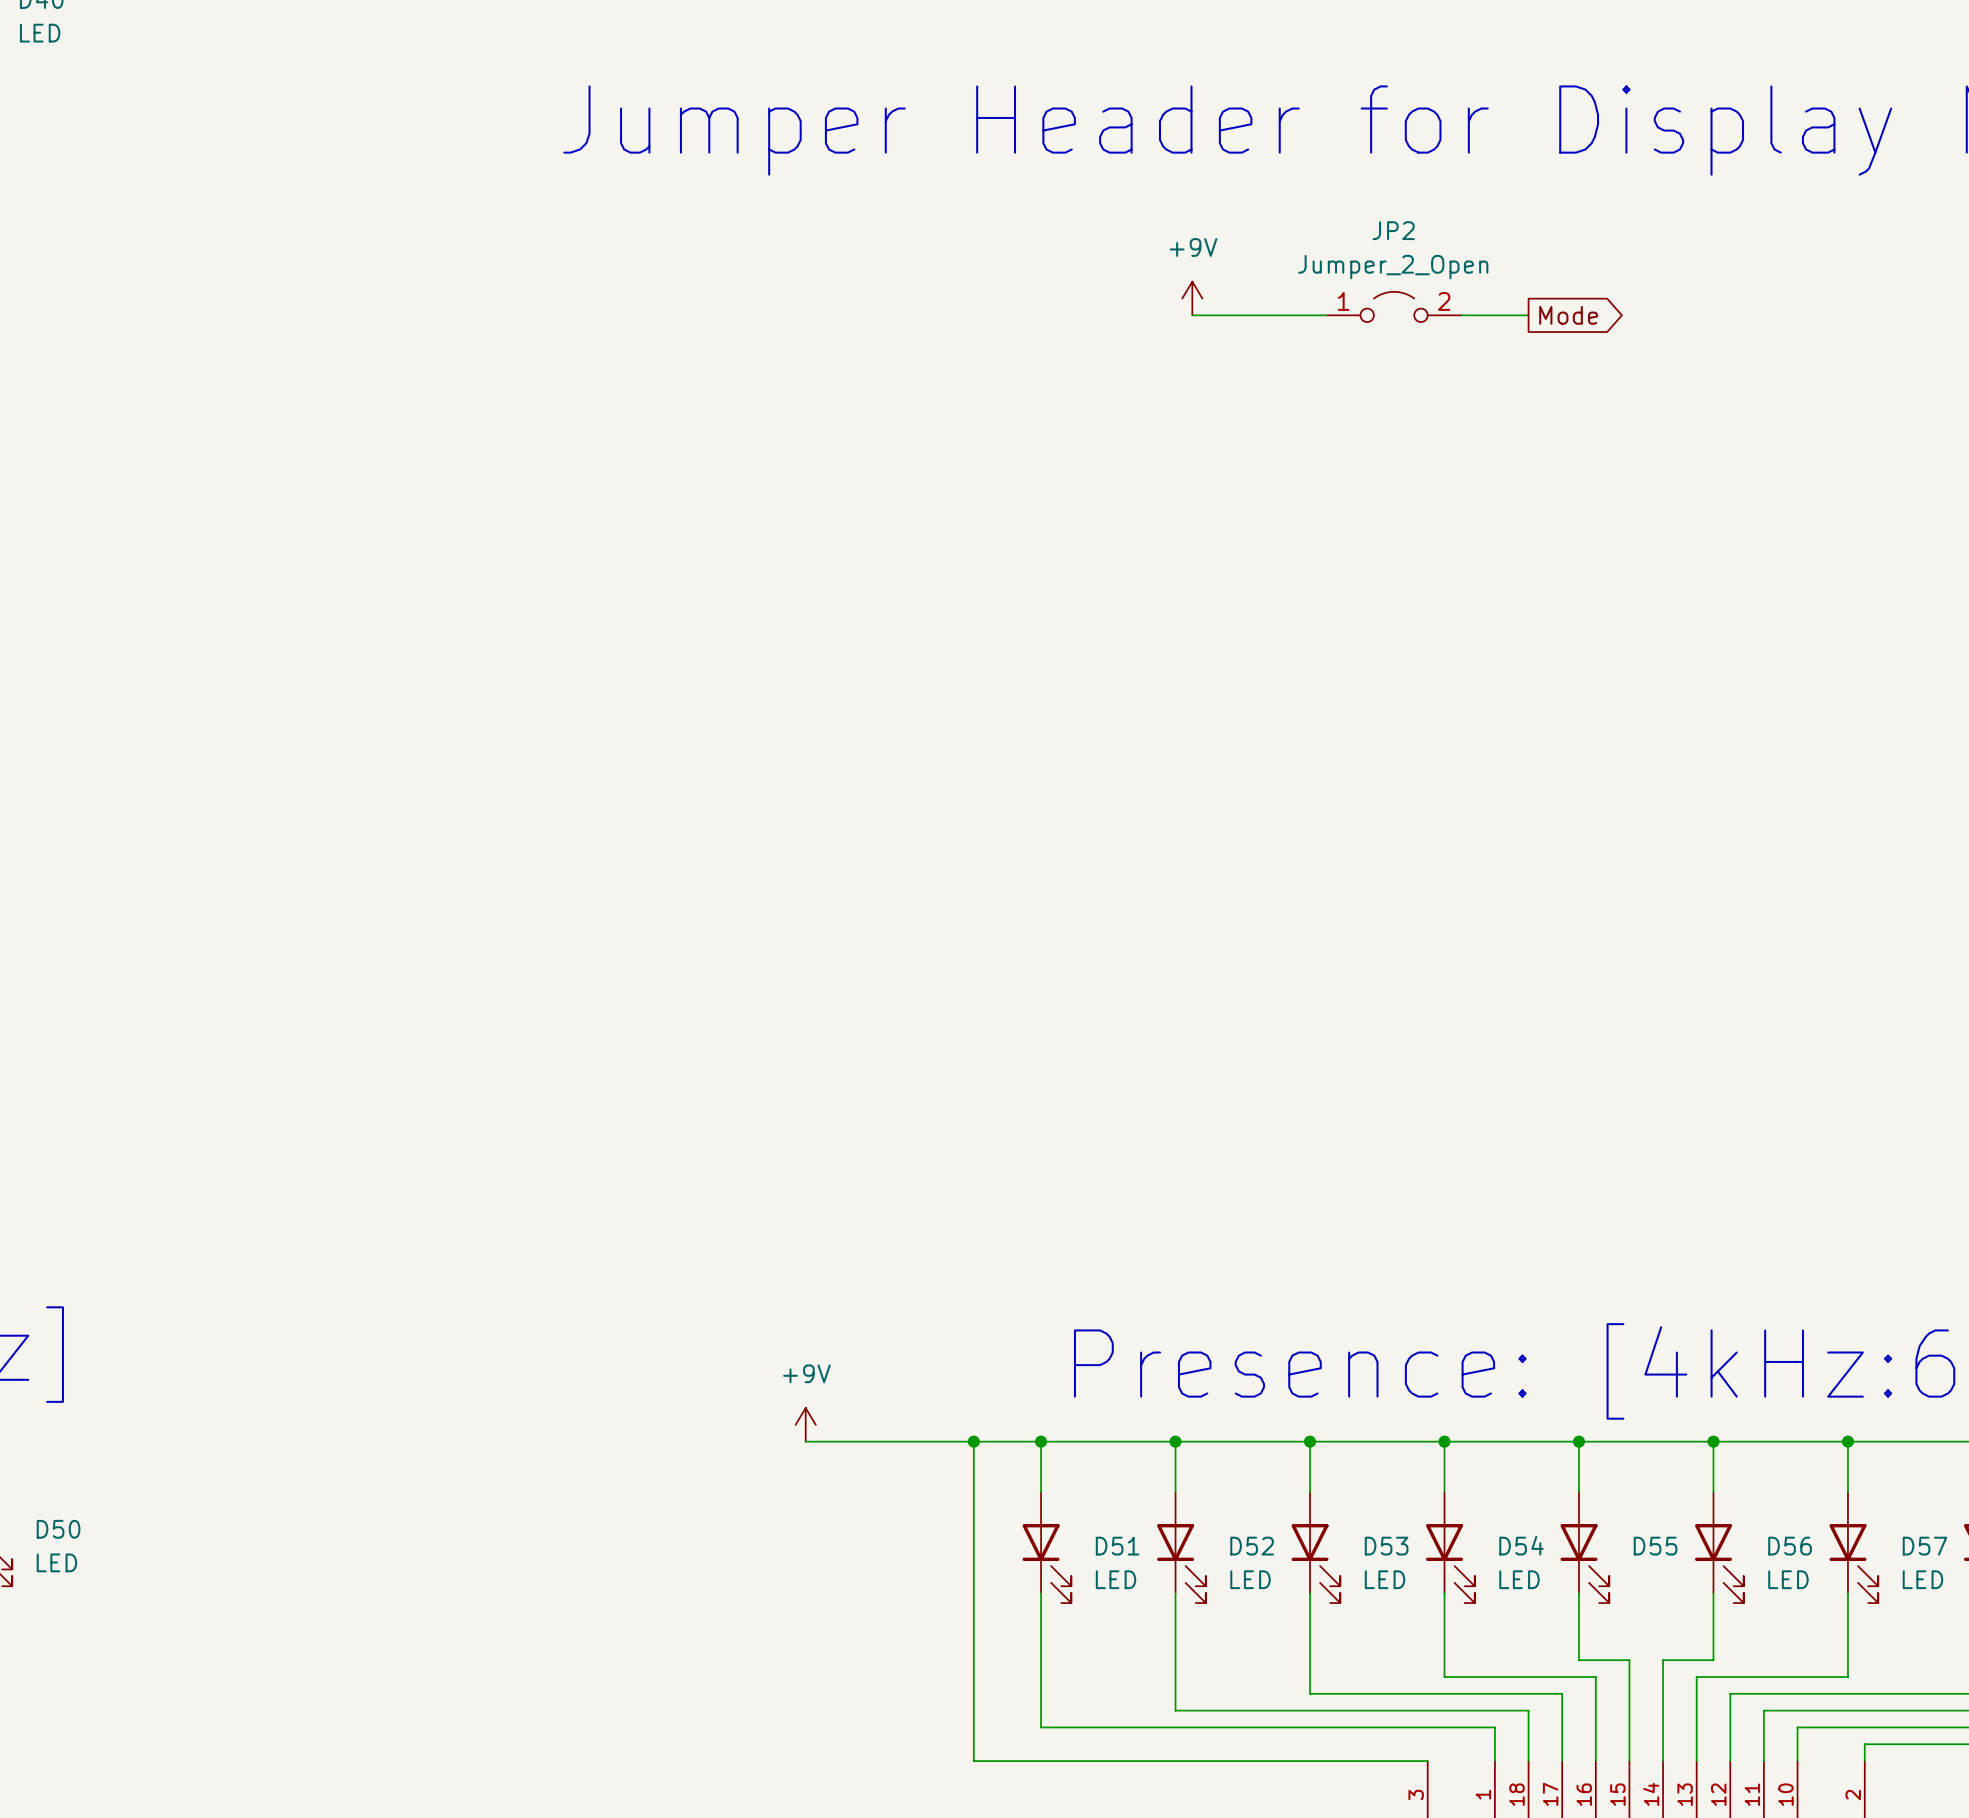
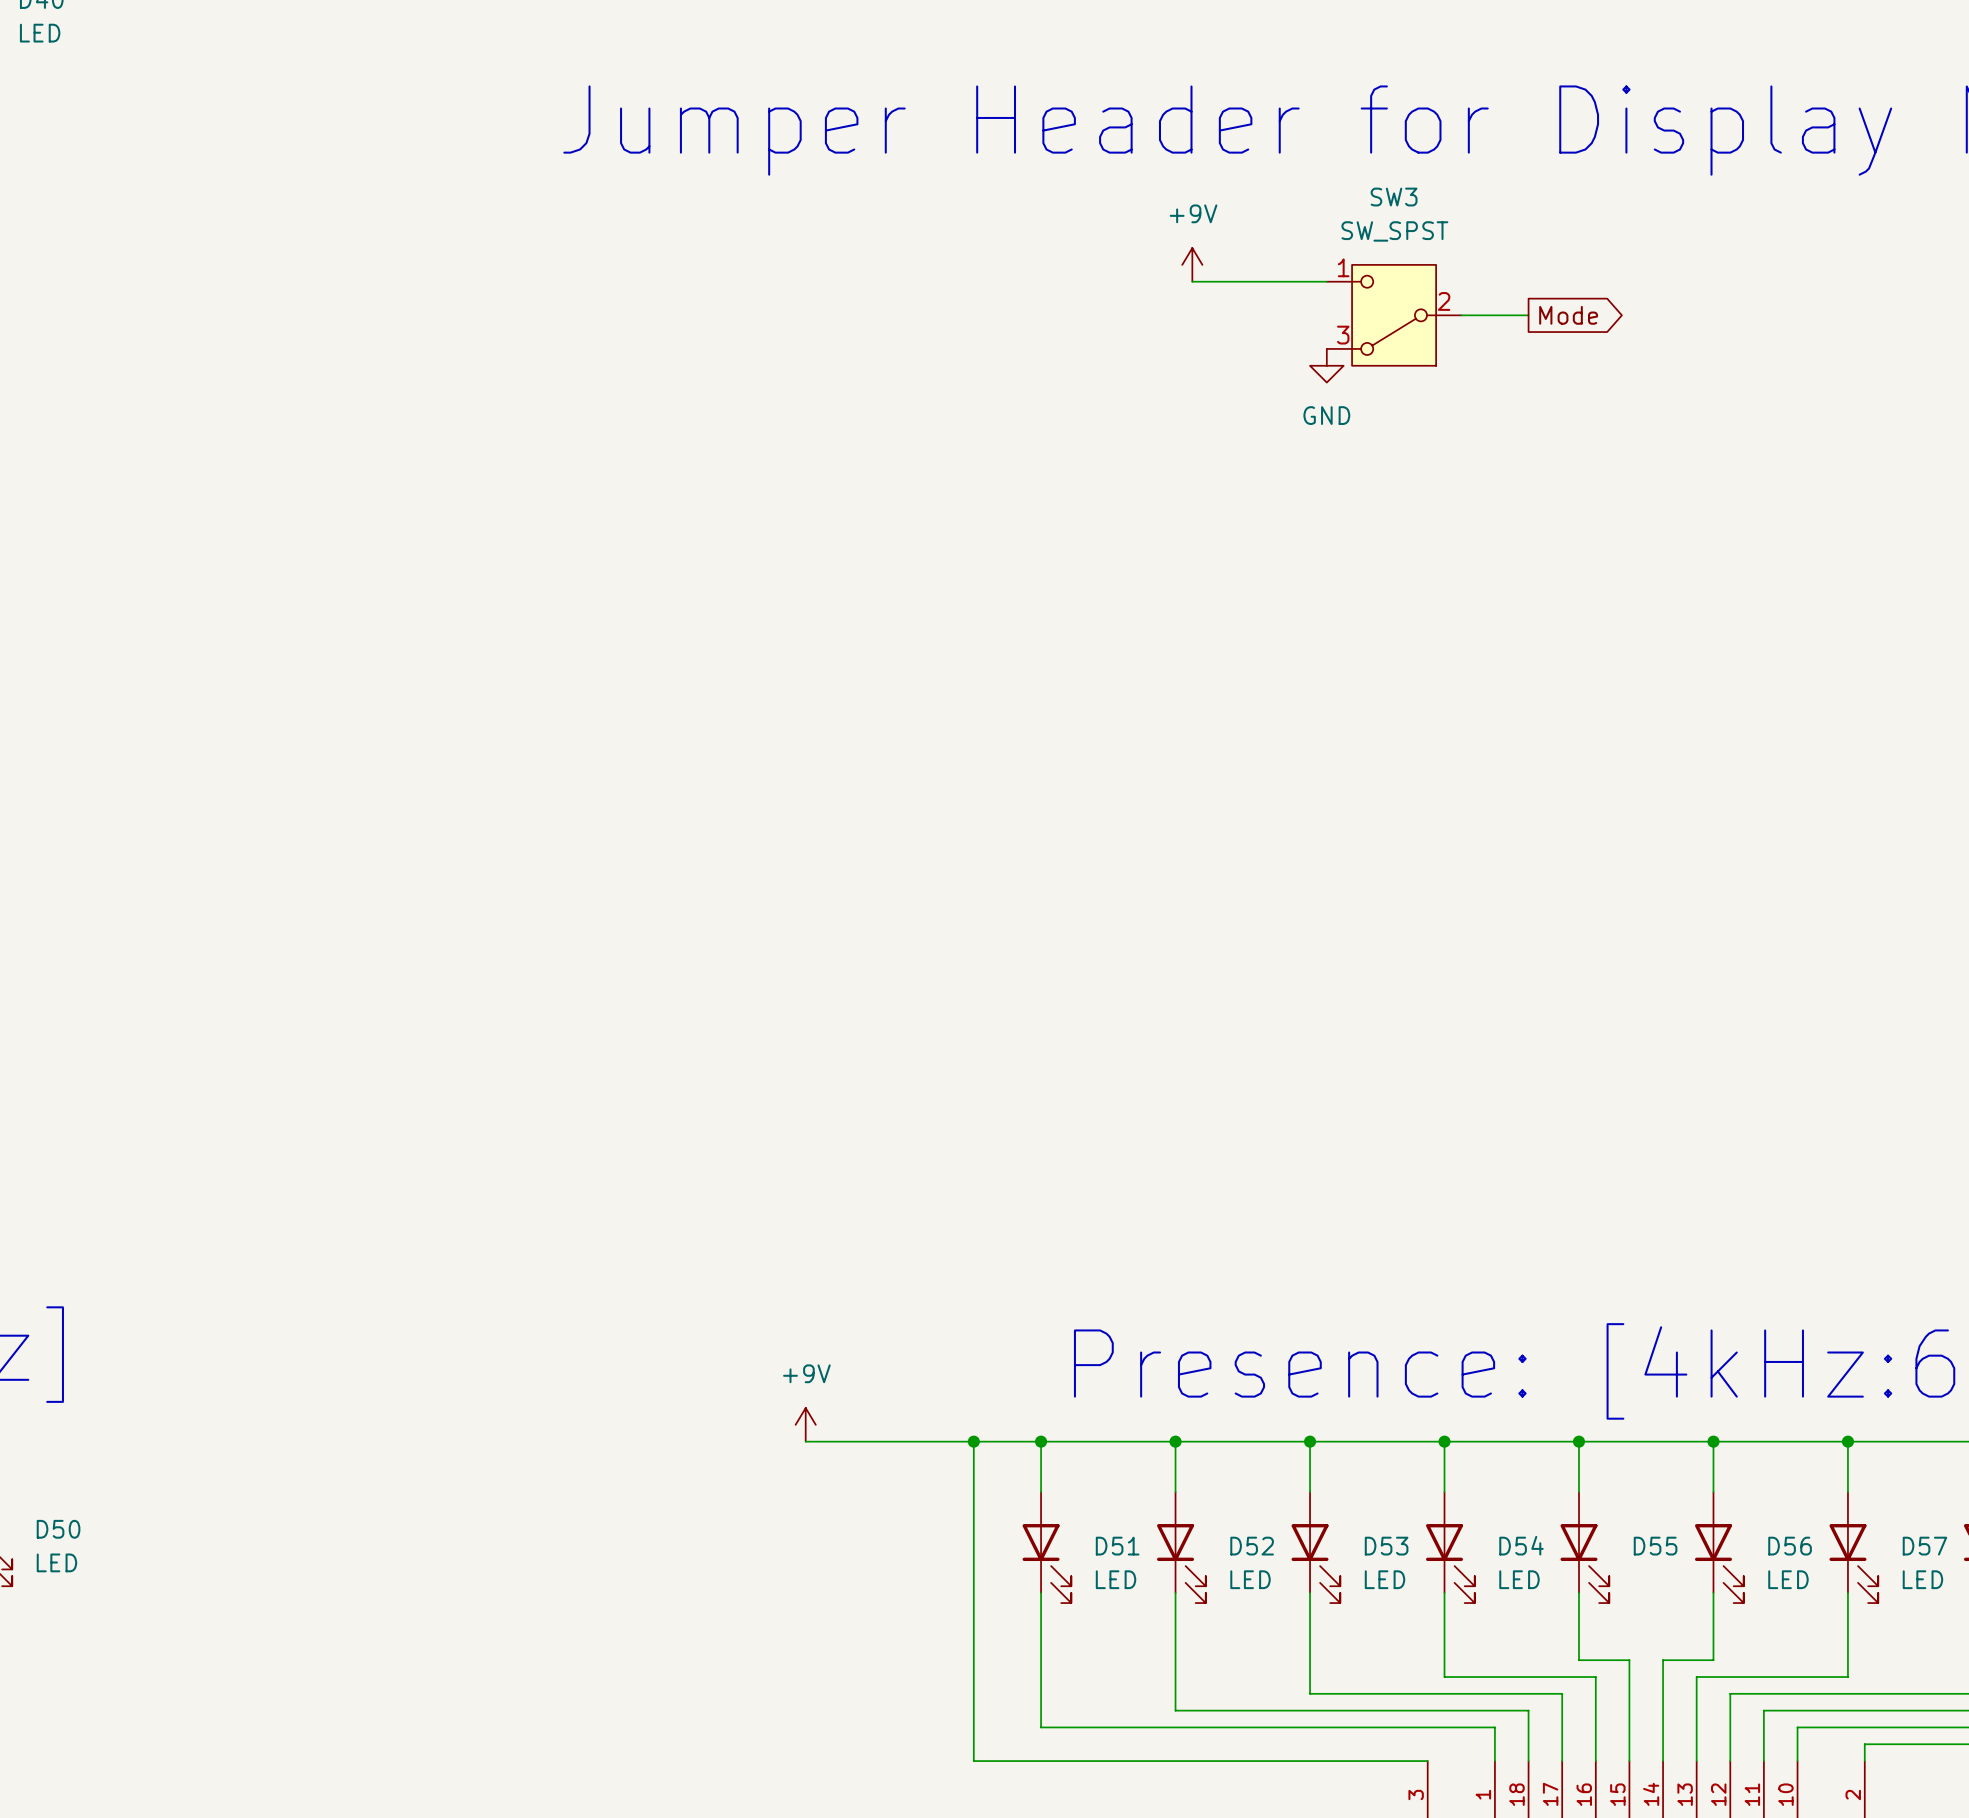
power symbol position: +9V (1192, 298) -> +9V (1192, 264)
JP2: Jumper_2_Open (1394, 306) -> none
wire: (1192, 315) (1326, 315) -> (1192, 281) (1326, 281)
SW3: none -> SW_SPST (1394, 315)
power symbol: none -> GND (1326, 365)

